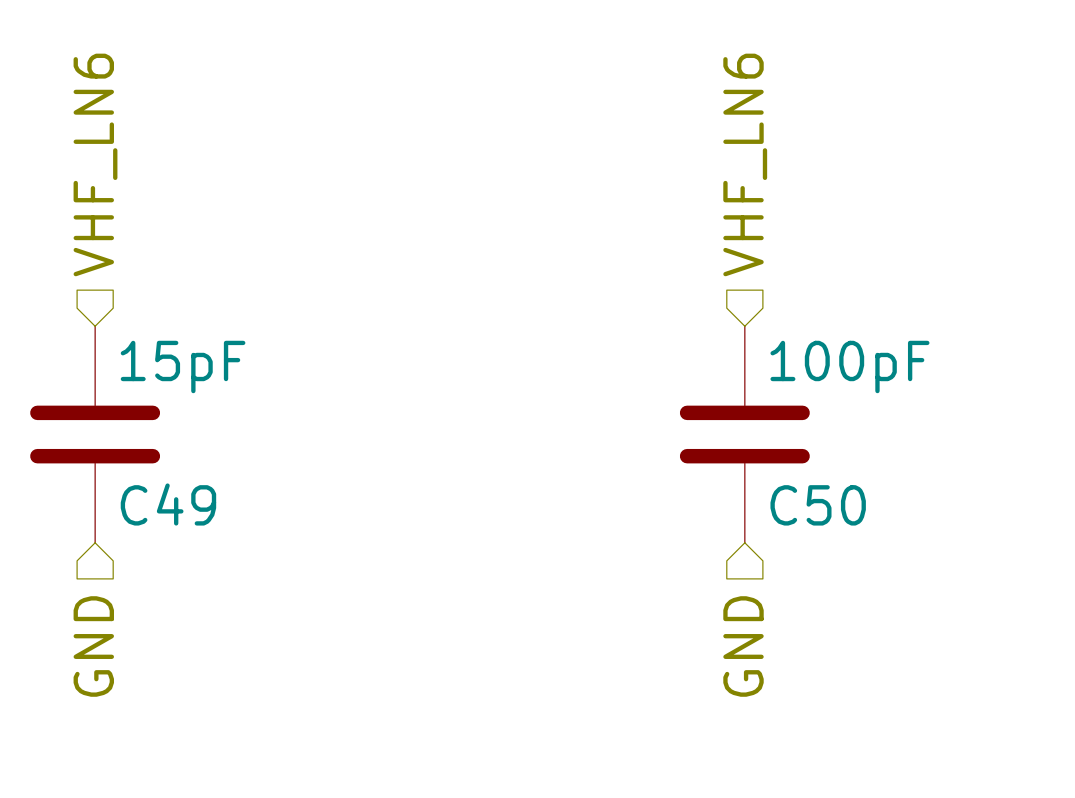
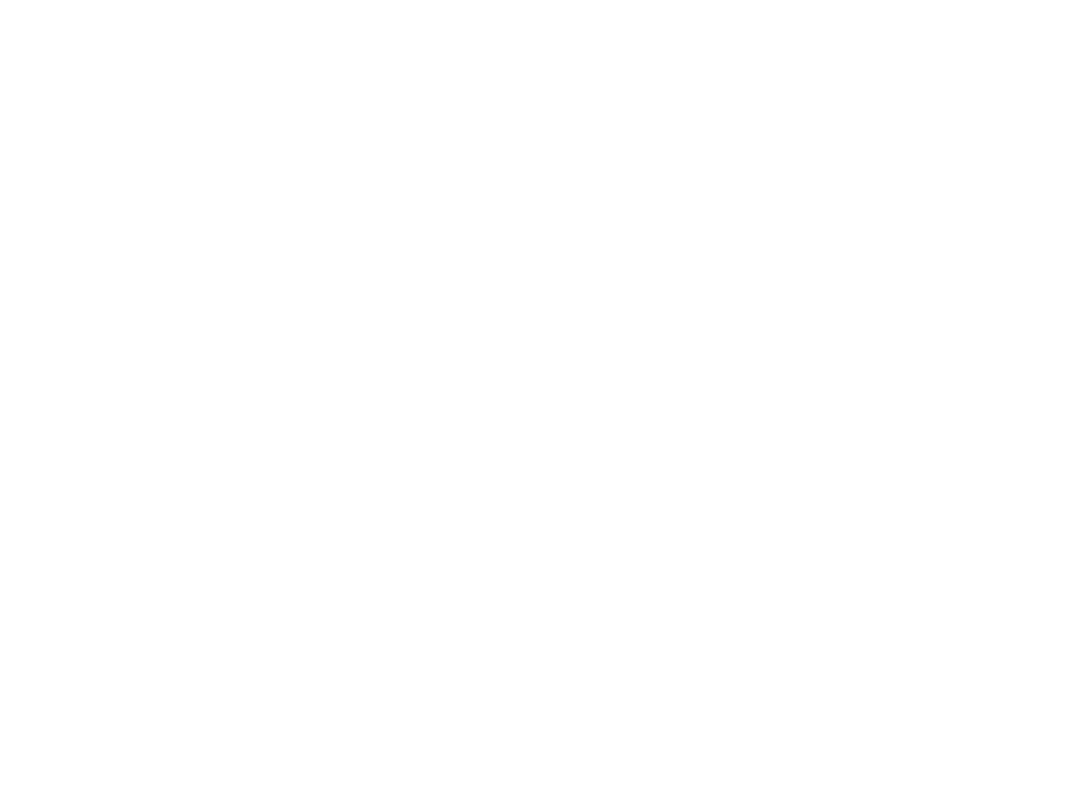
hierarchical label: VHF_LN6 (95, 164) -> none
hierarchical label: VHF_LN6 (745, 164) -> none
C49: 15pF (95, 434) -> none
C50: 100pF (744, 434) -> none
hierarchical label: GND (93, 646) -> none
hierarchical label: GND (743, 646) -> none

